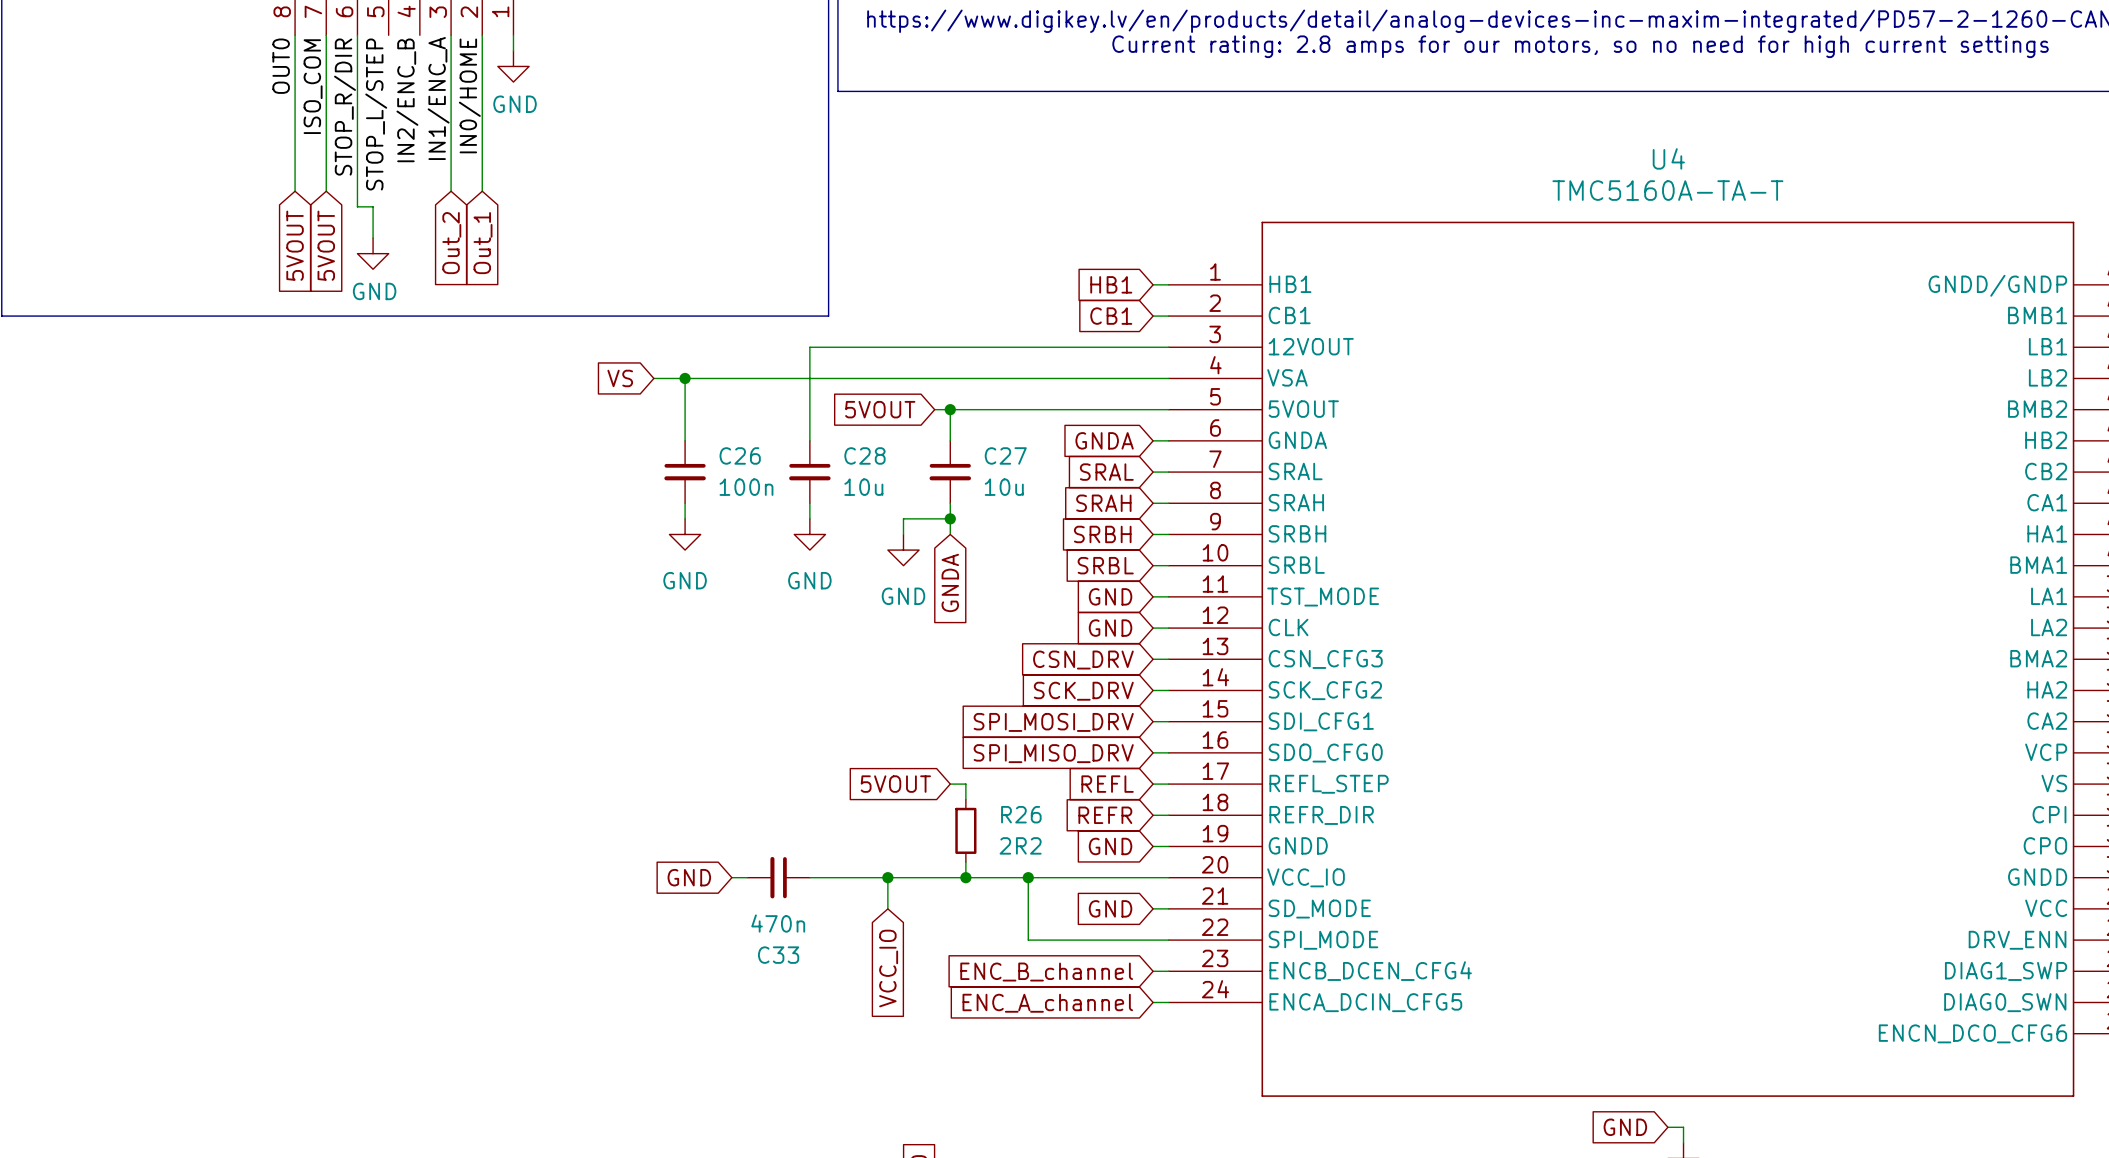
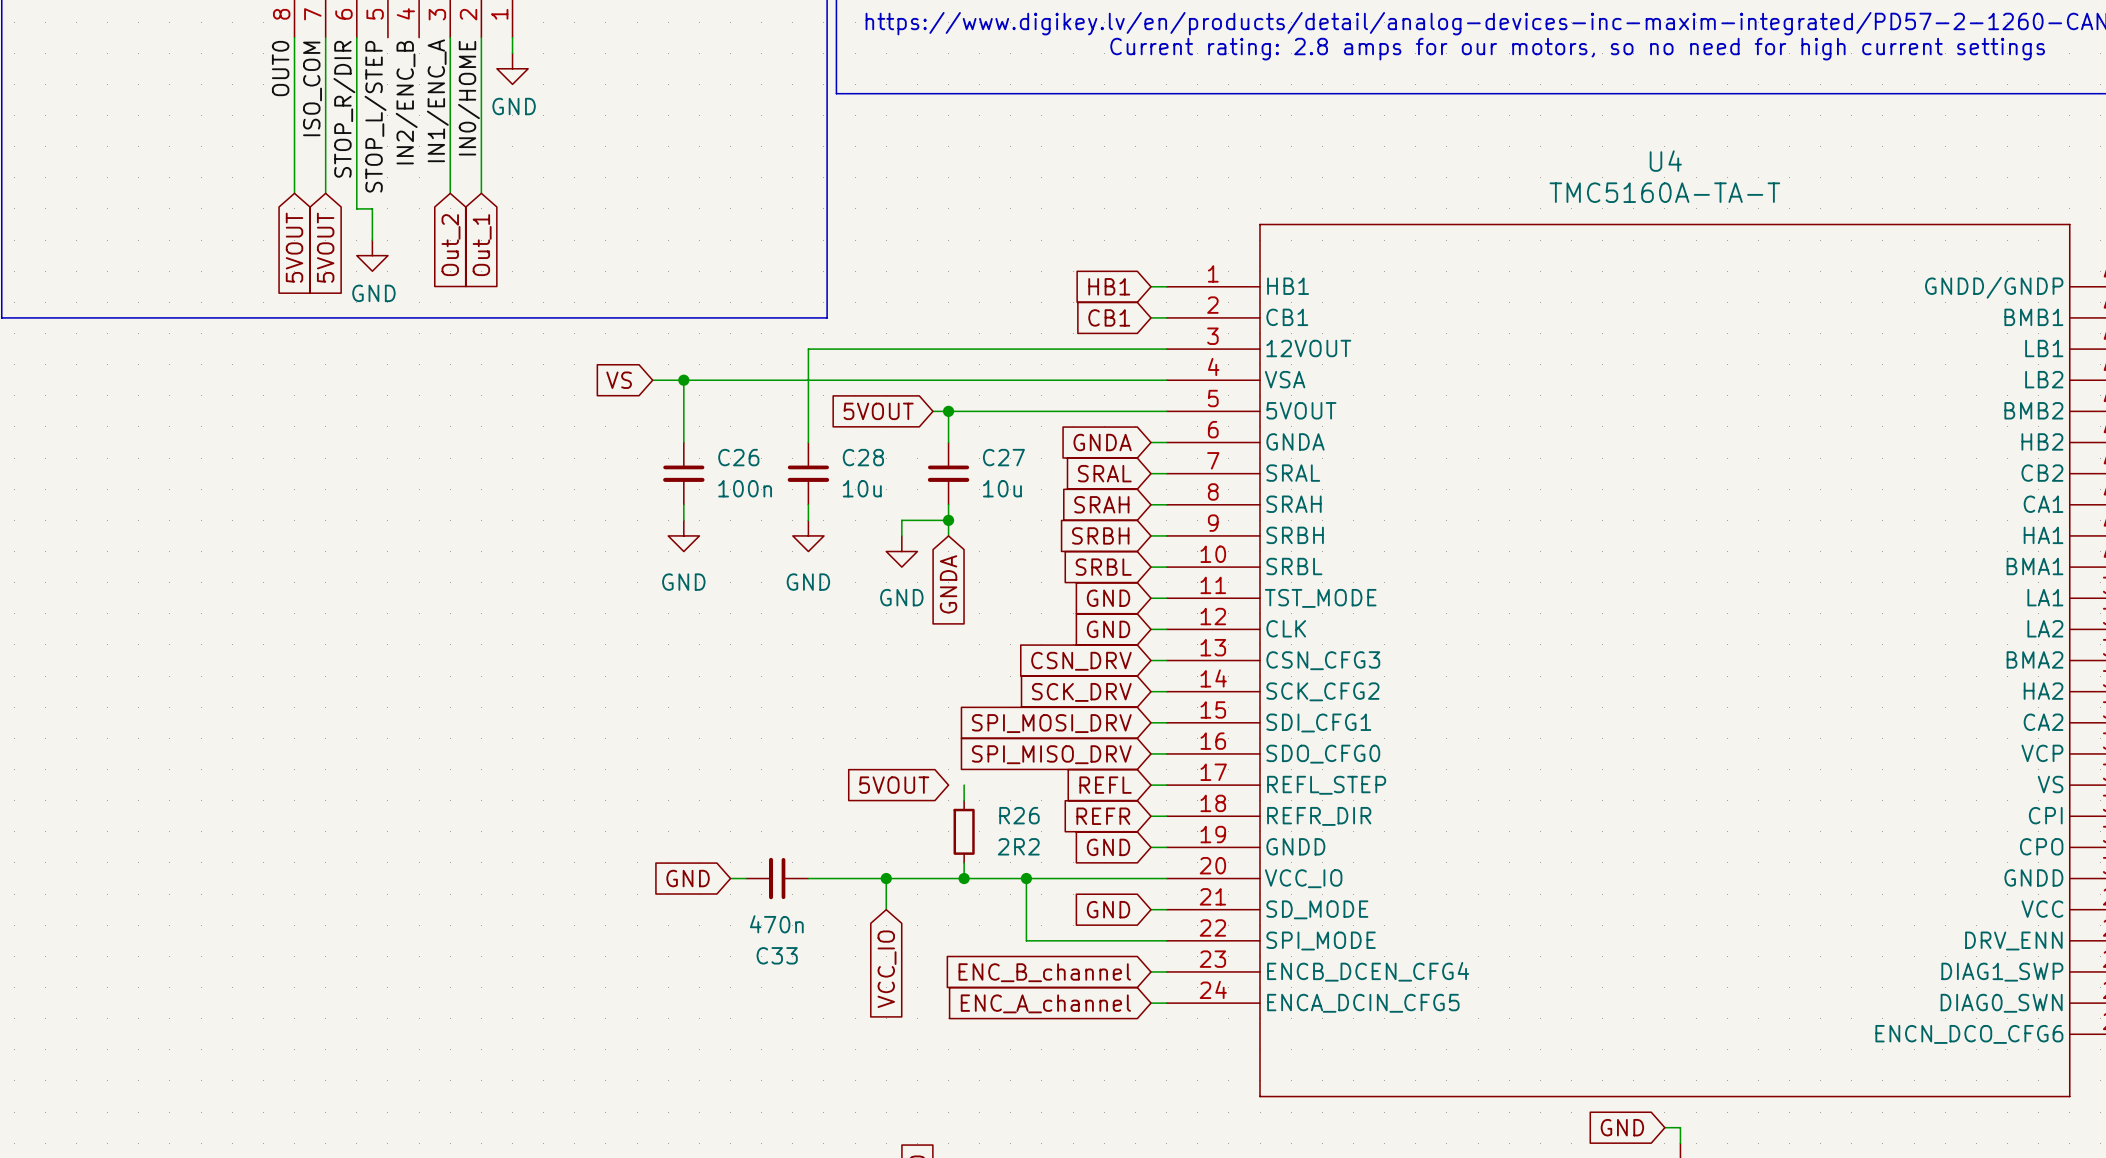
wire: (950, 784) (965, 784) -> none

